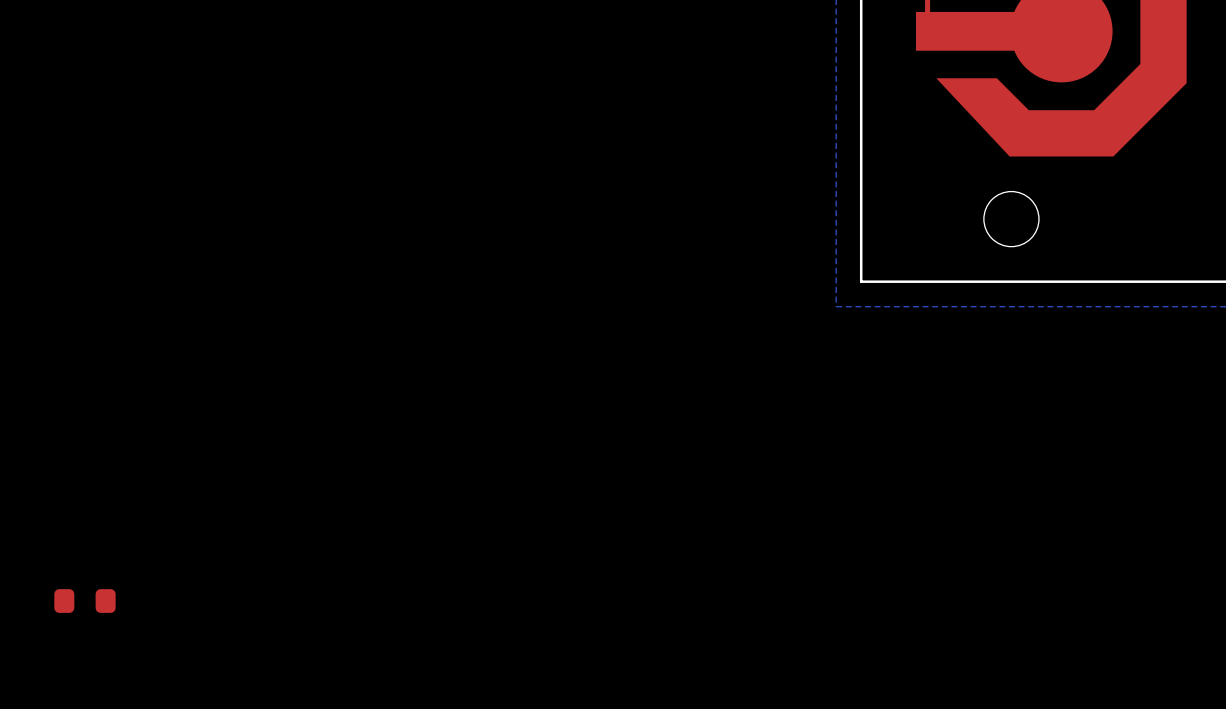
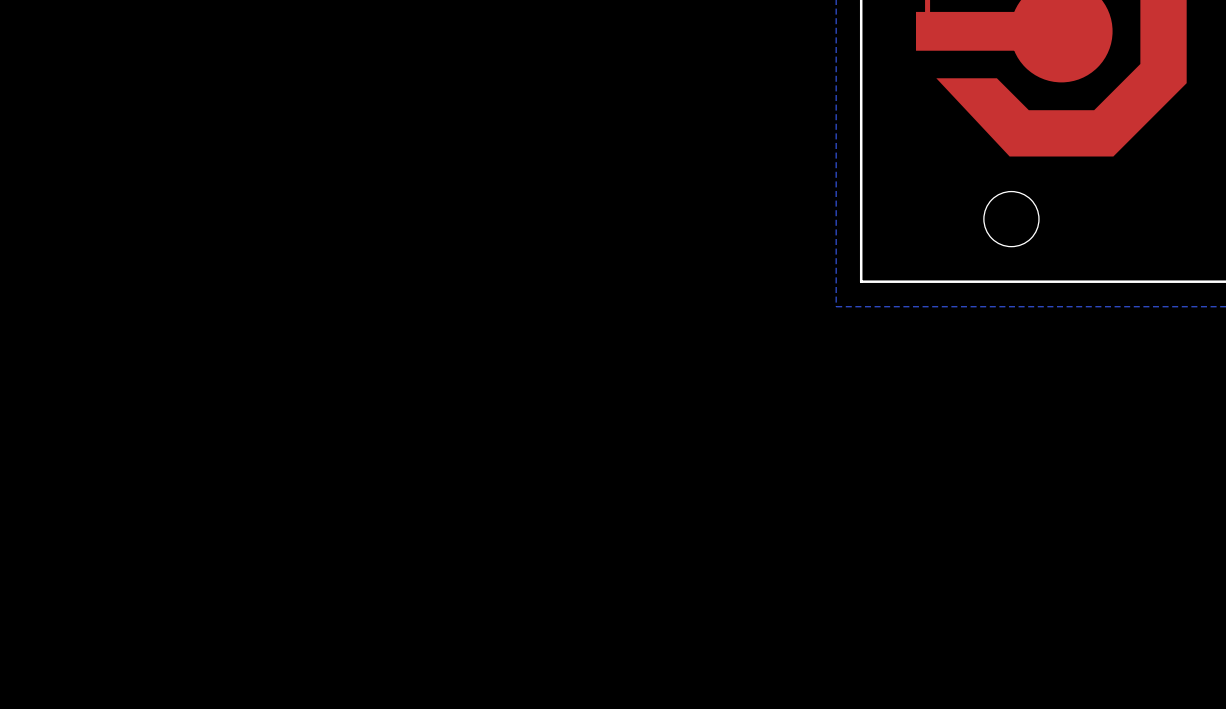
part: (84, 601) -> none

